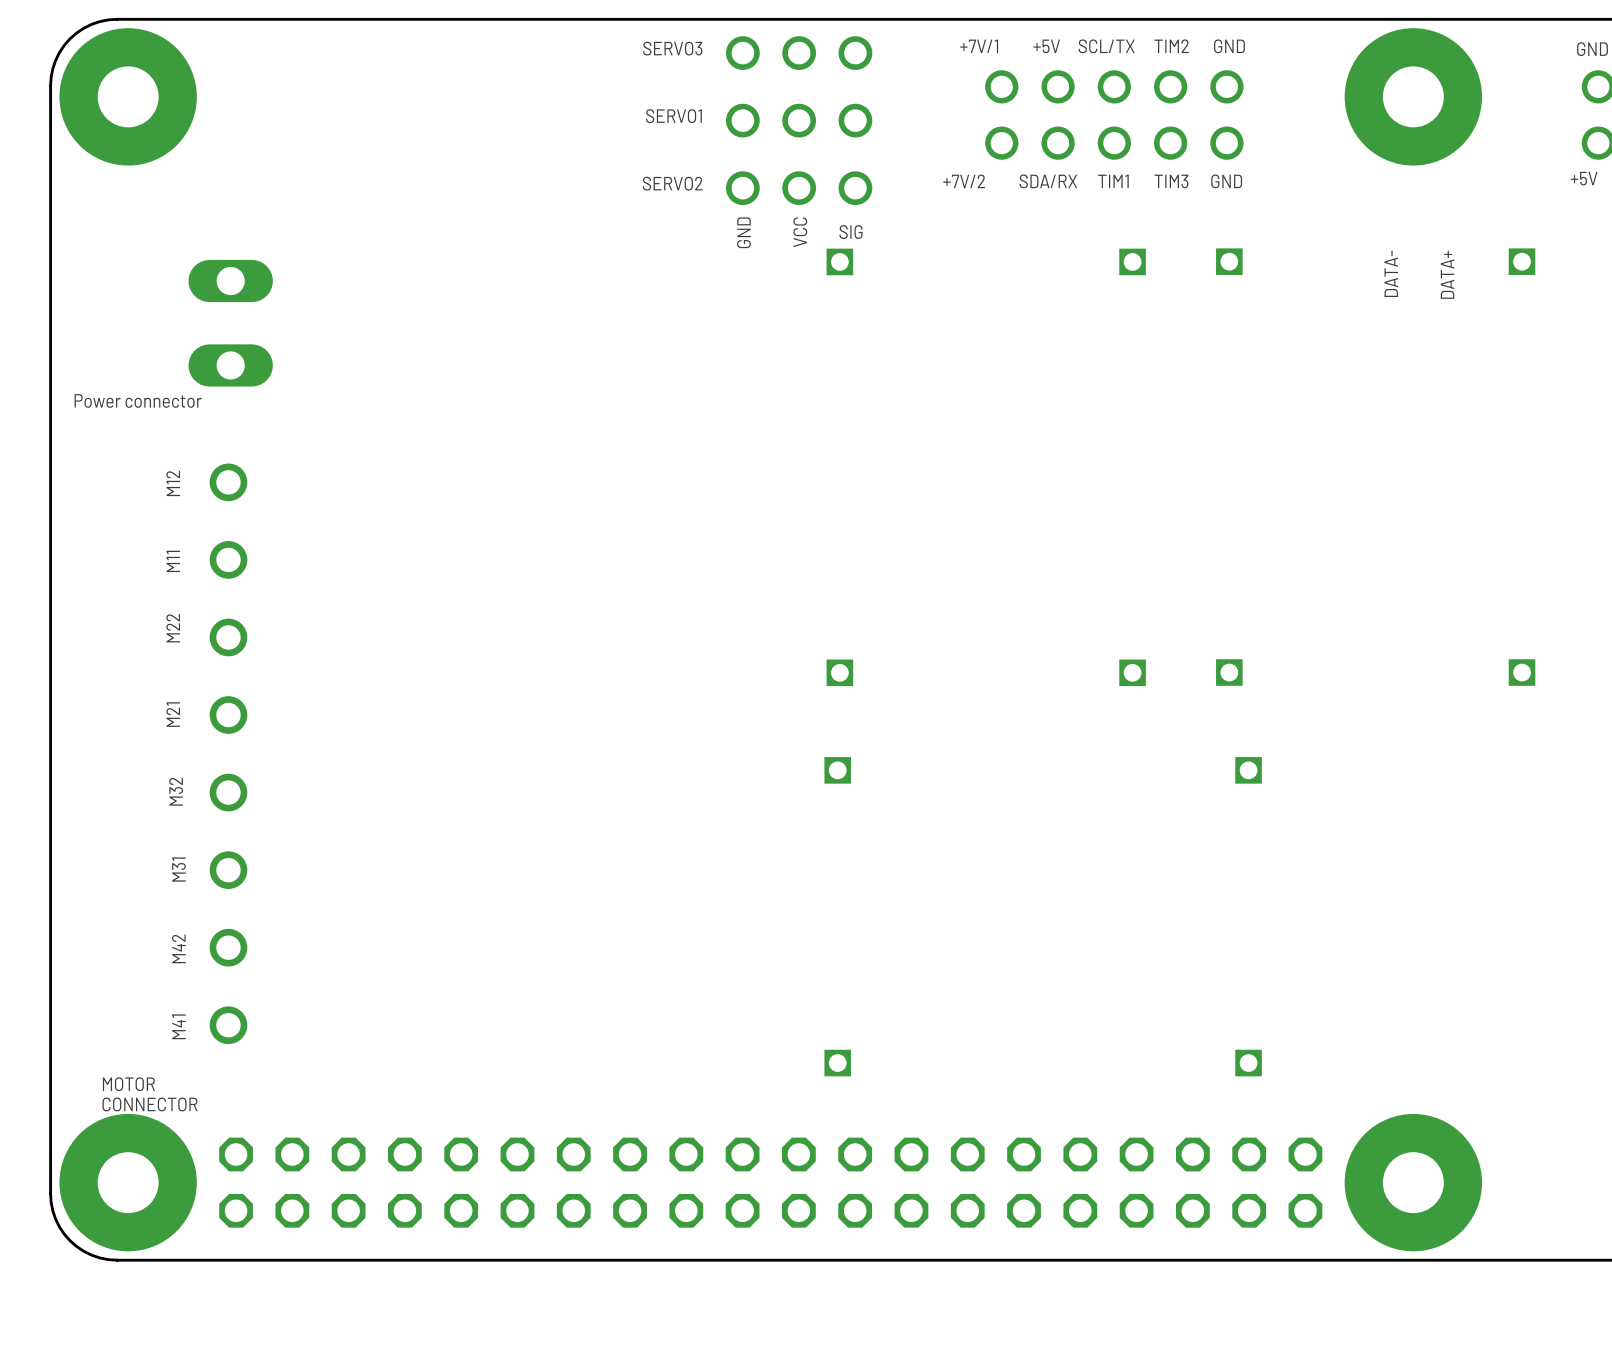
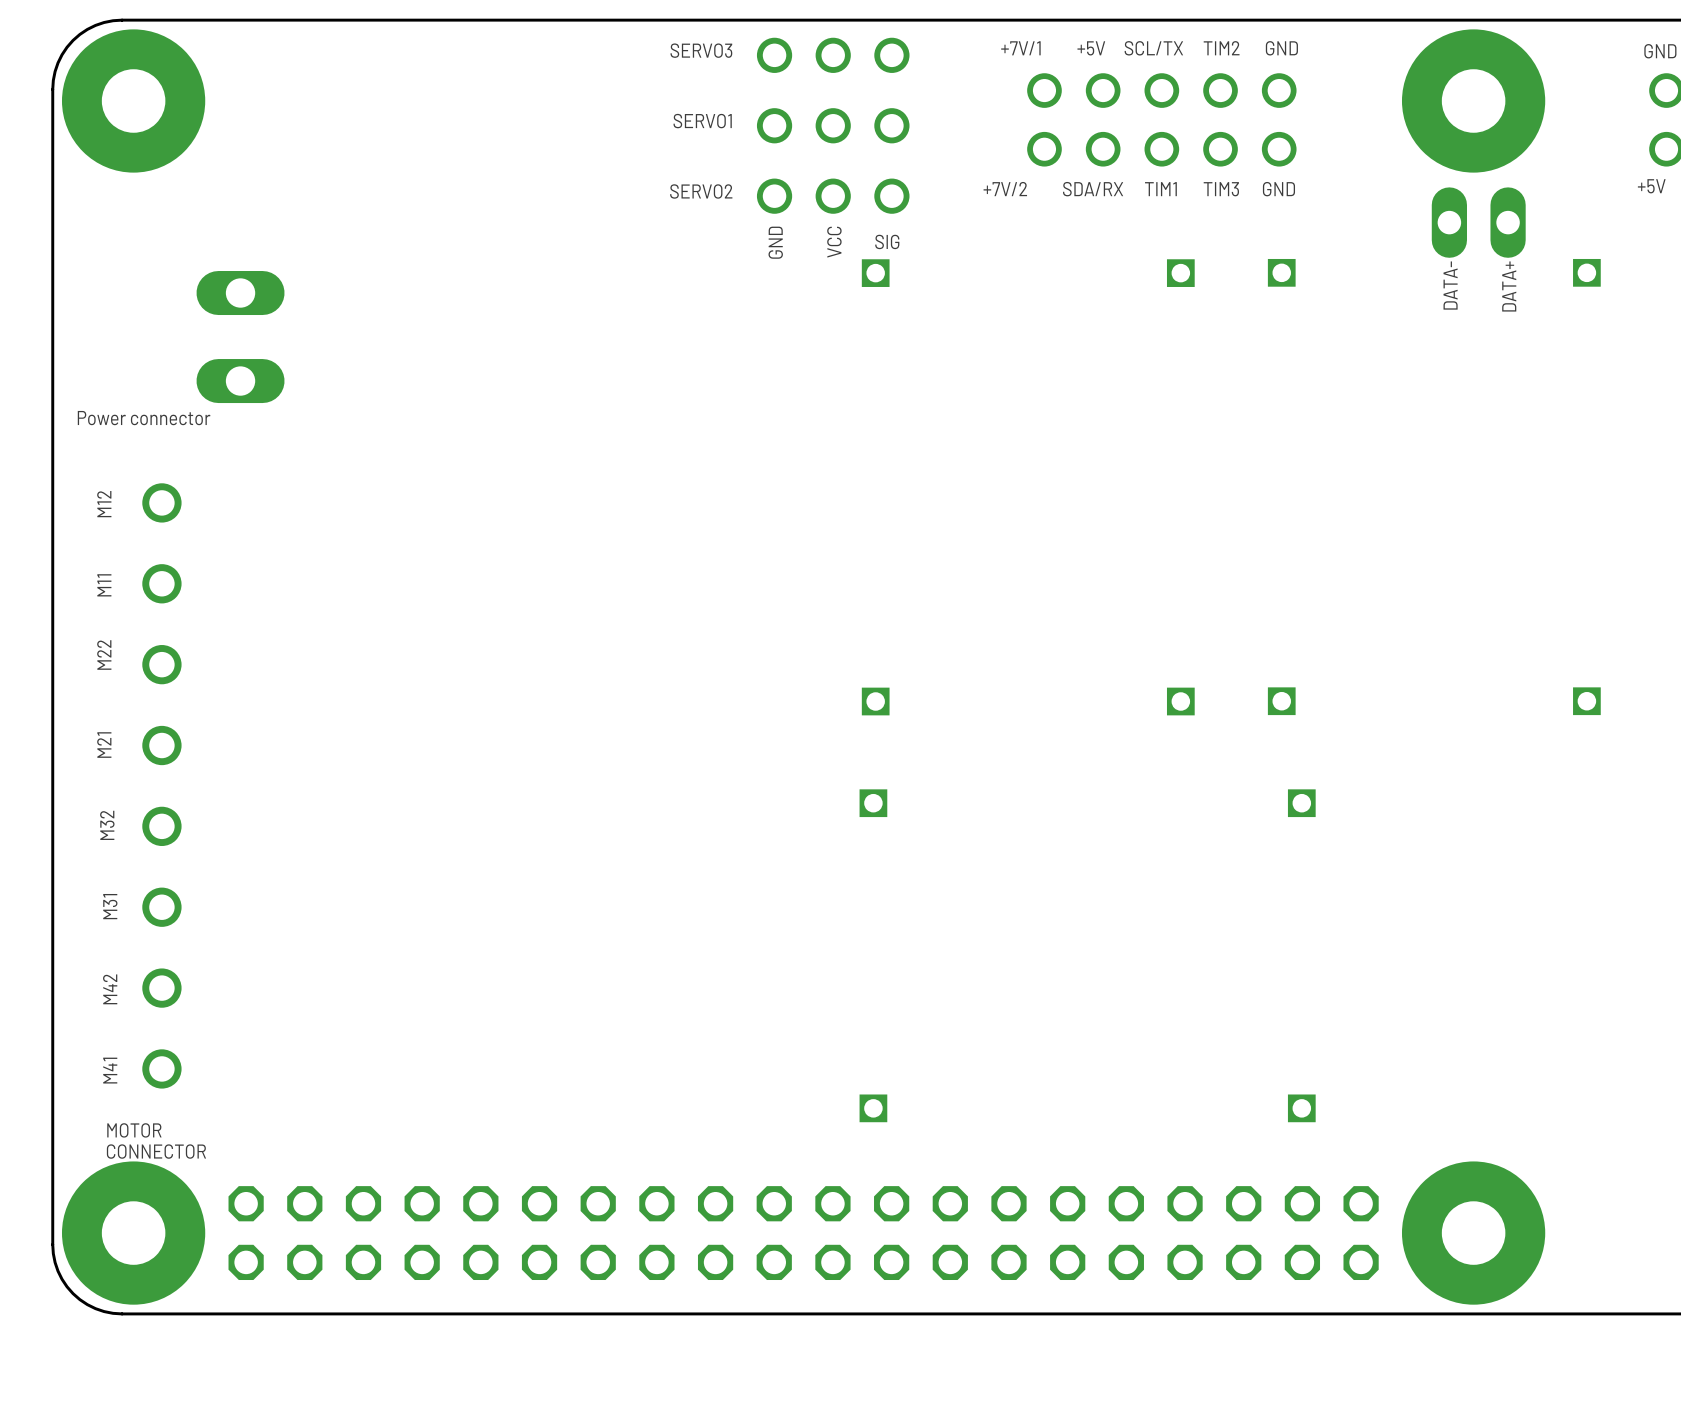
part: none -> (1478, 222)
text position: M12 (173, 483) -> M12 (104, 504)
text position: M11 (173, 561) -> M11 (104, 585)
text position: M22 (173, 628) -> M22 (104, 655)
text position: M21 (173, 714) -> M21 (104, 745)
part position: (228, 753) -> (161, 785)
text position: M32 (176, 791) -> M32 (107, 825)
text position: M31 (178, 869) -> M31 (110, 906)
text position: M42 (178, 948) -> M42 (110, 989)
text position: M41 (178, 1026) -> M41 (110, 1070)

